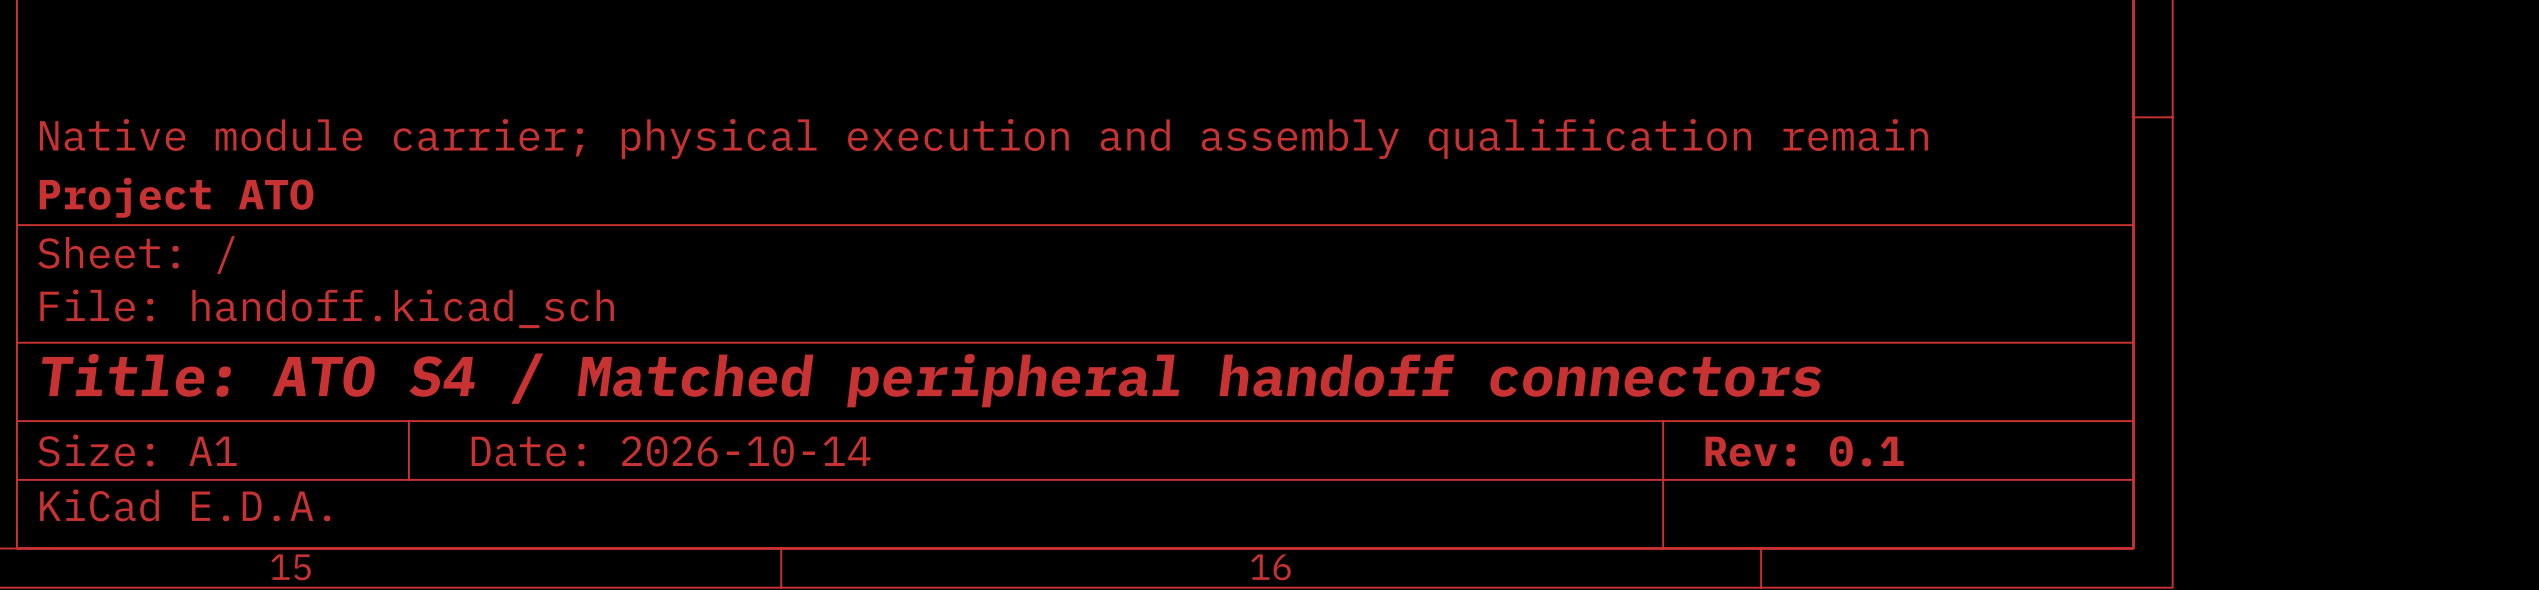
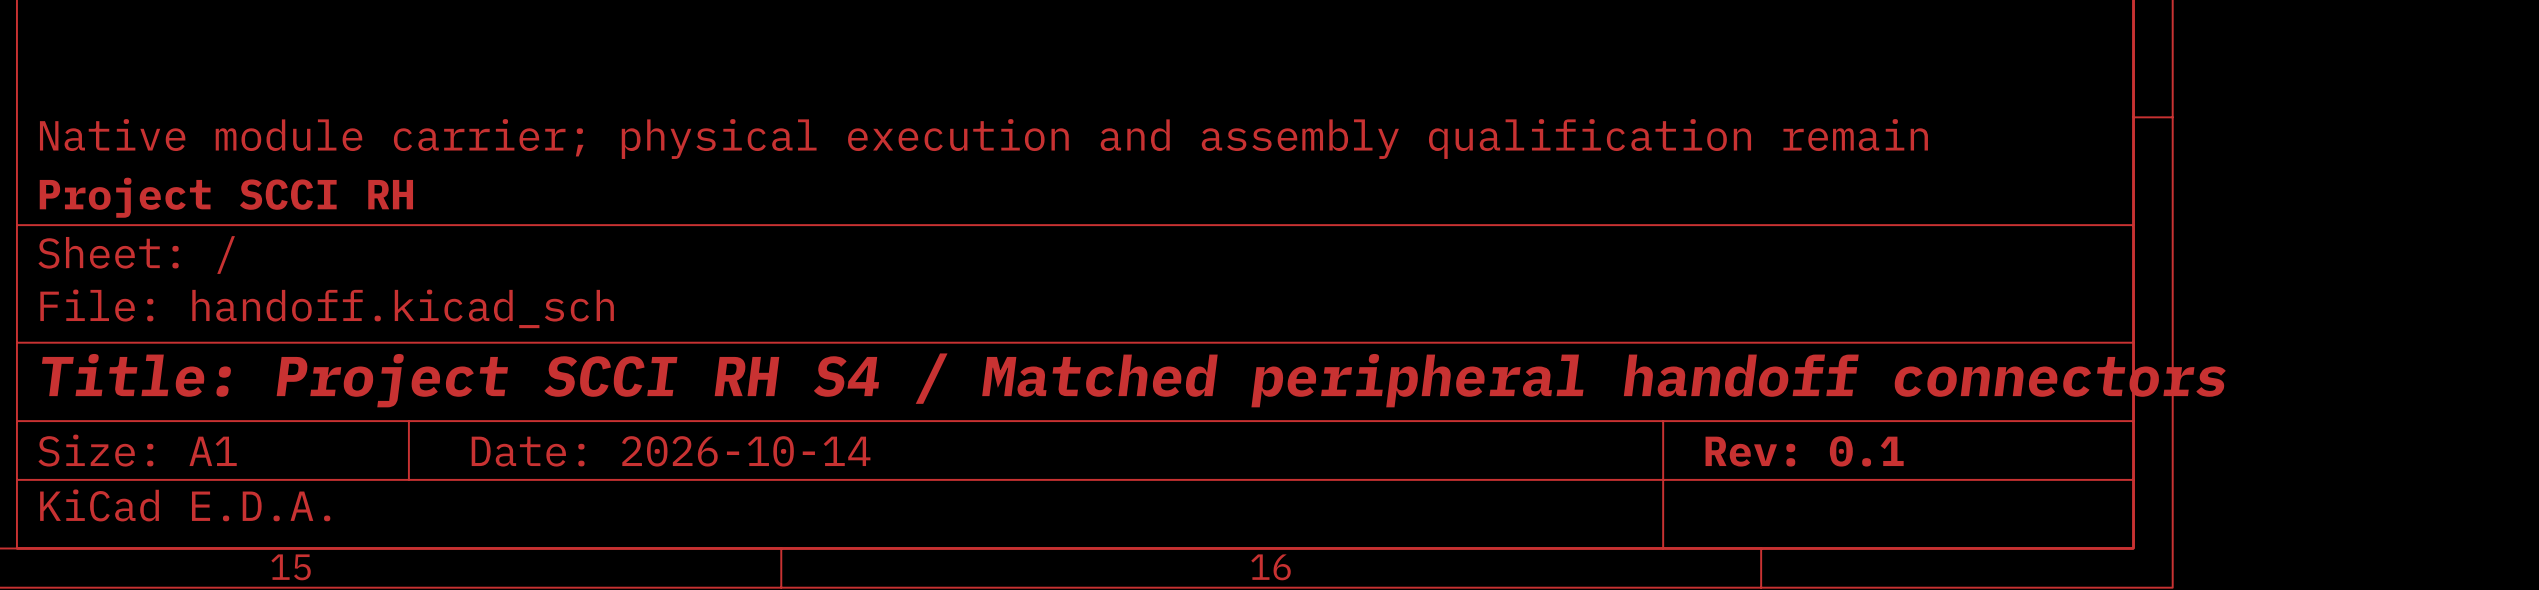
title block: Project ATO (176, 197) -> Project SCCI RH (226, 197)
title block: Title: ATO S4 / Matched peripheral handoff connectors (931, 380) -> Title: Project SCCI RH S4 / Matched peripheral handoff connectors (1133, 380)

